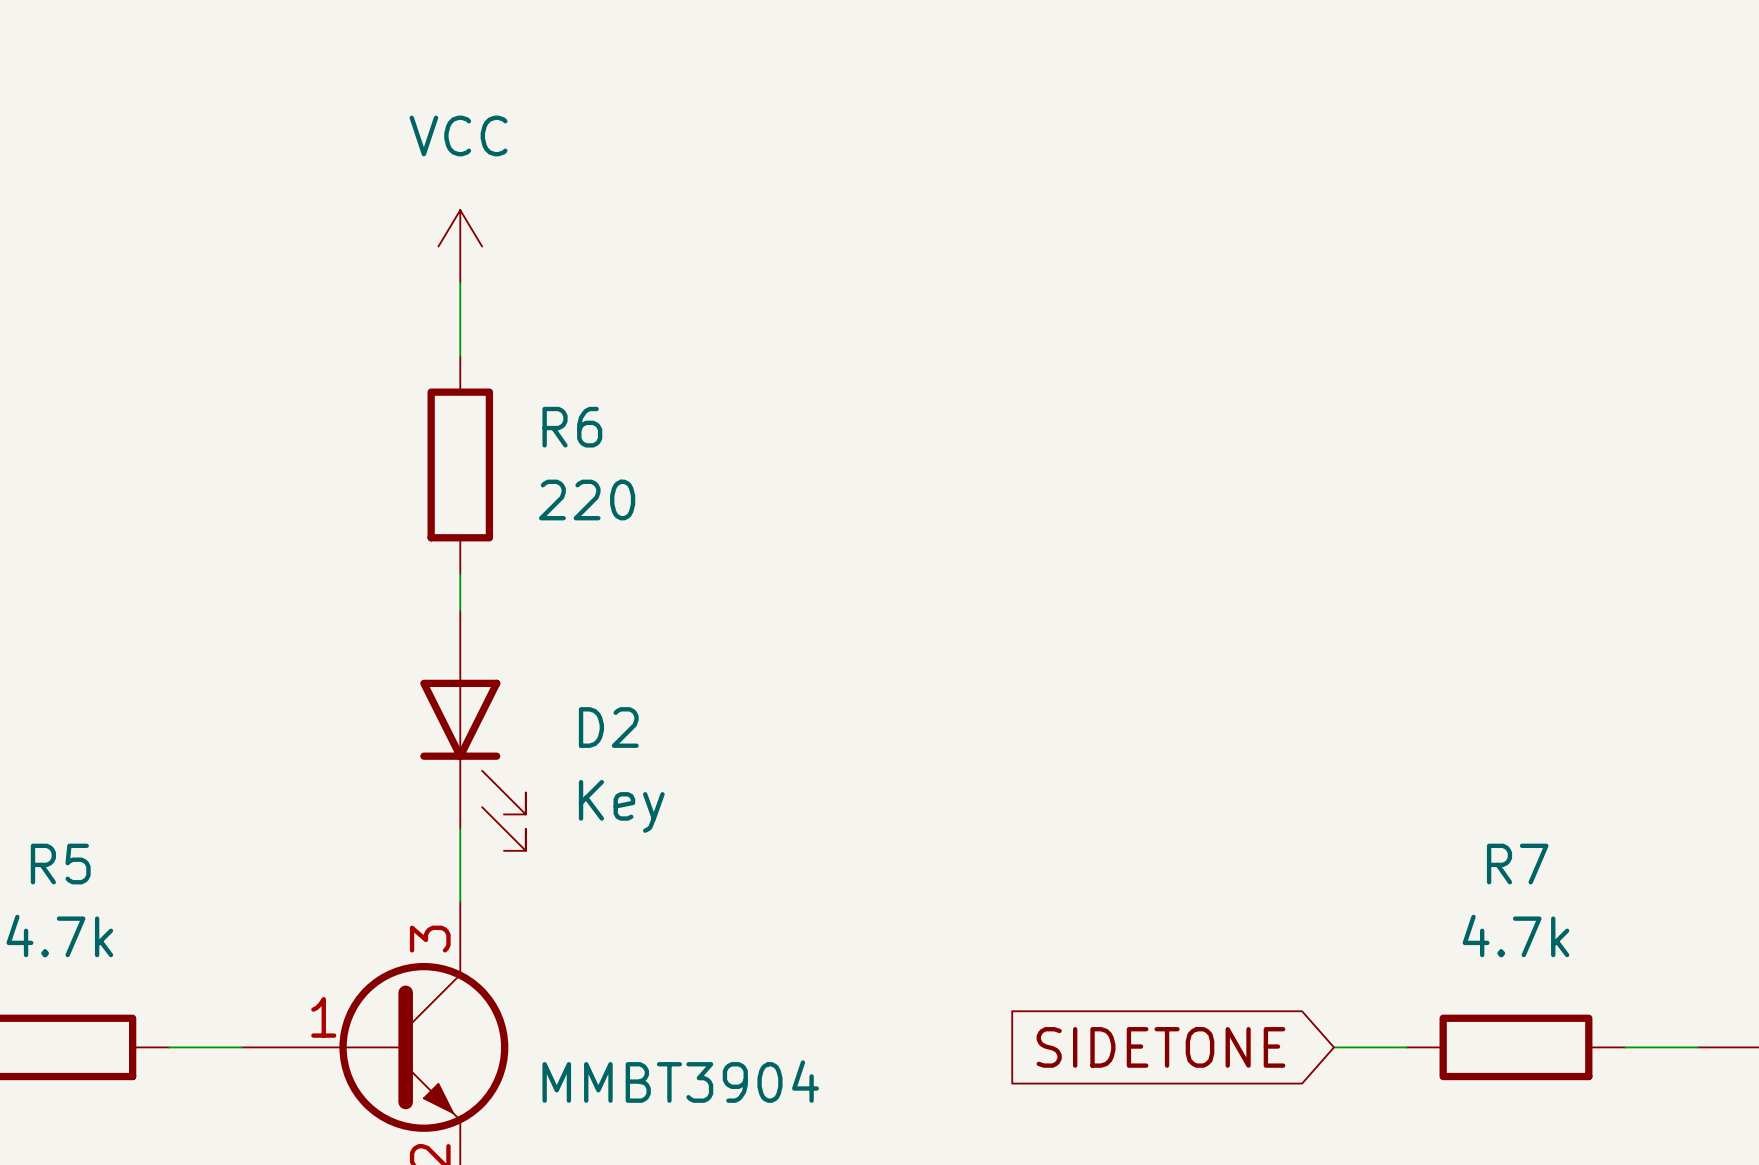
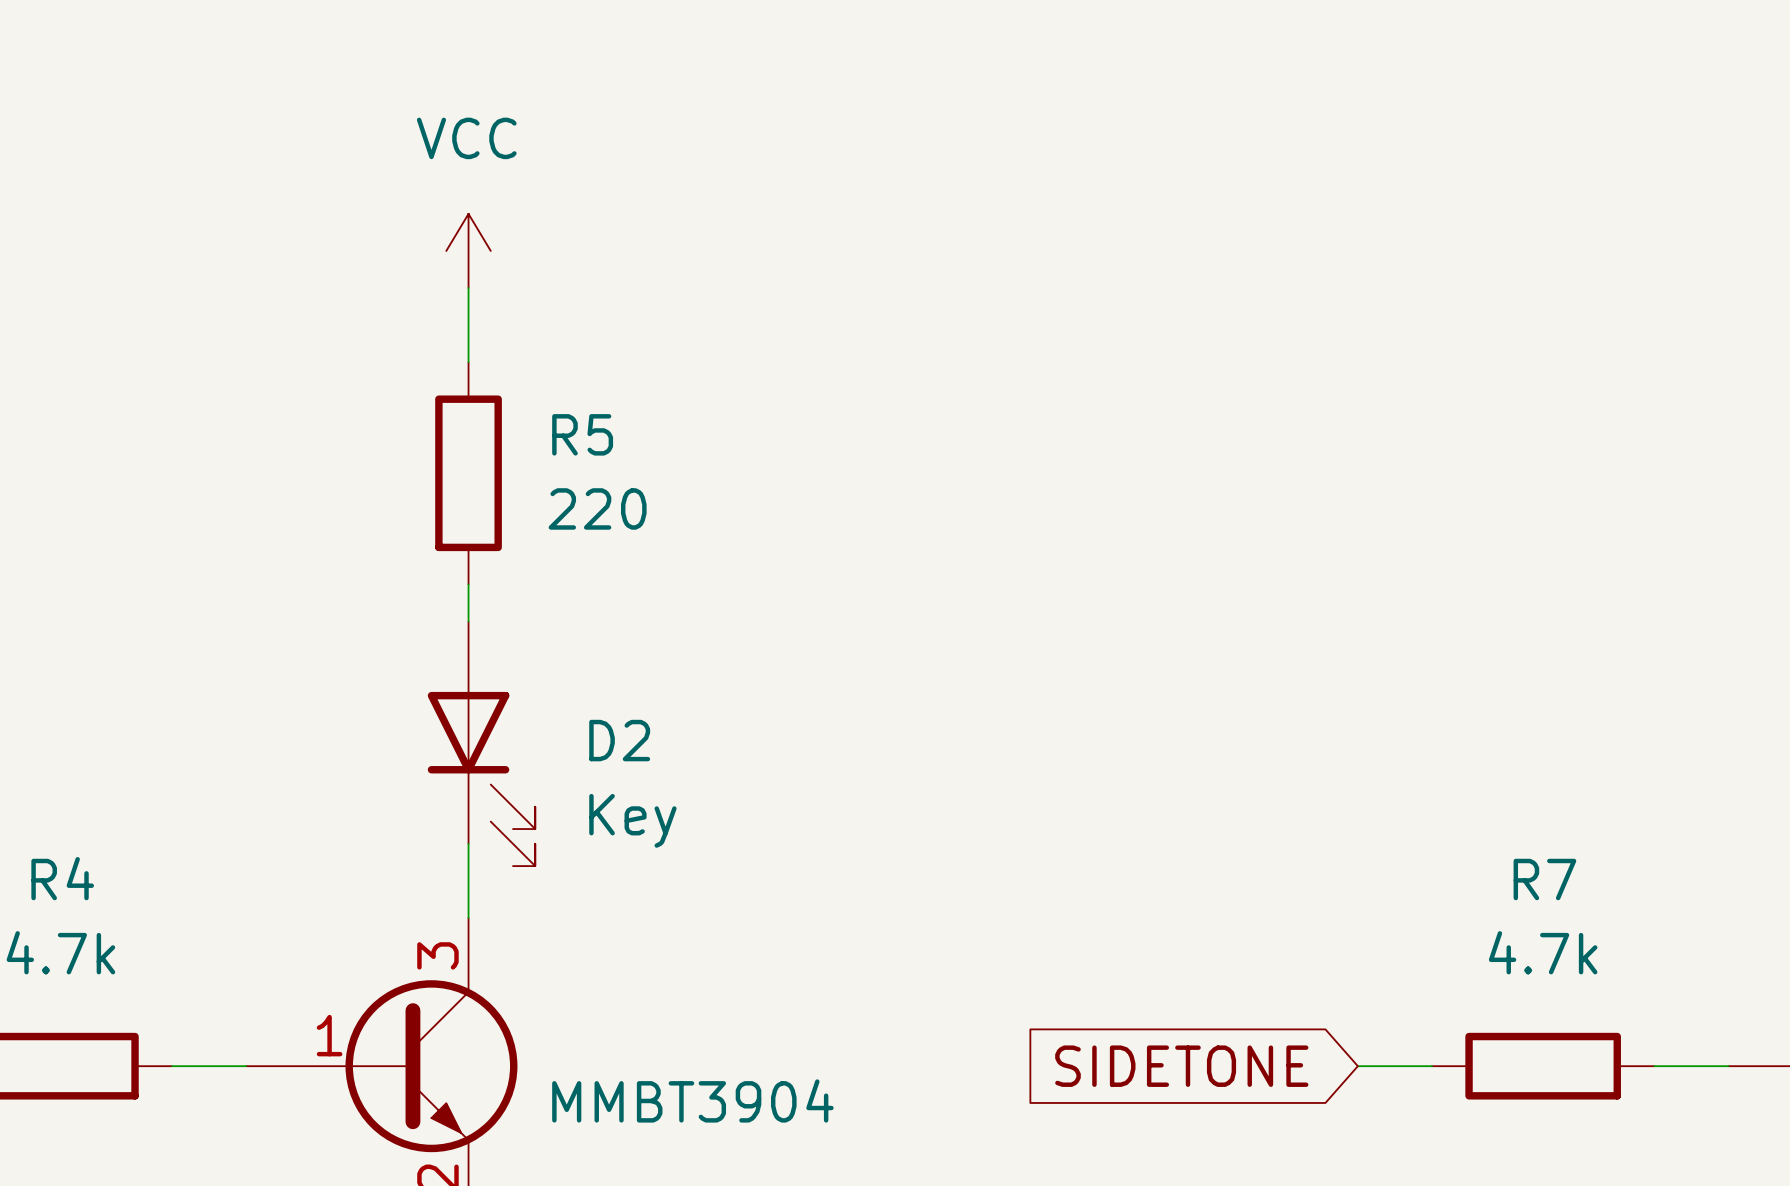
R6 name: R6 (572, 427) -> R5 (582, 434)
R5 name: R5 (60, 864) -> R4 (62, 878)

